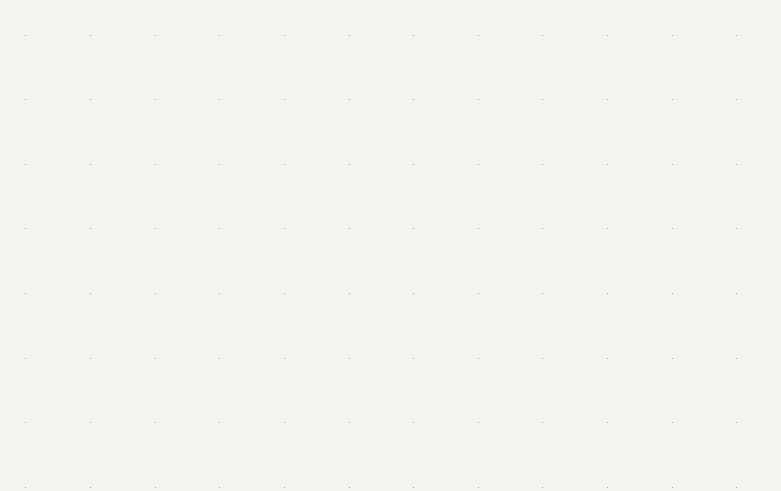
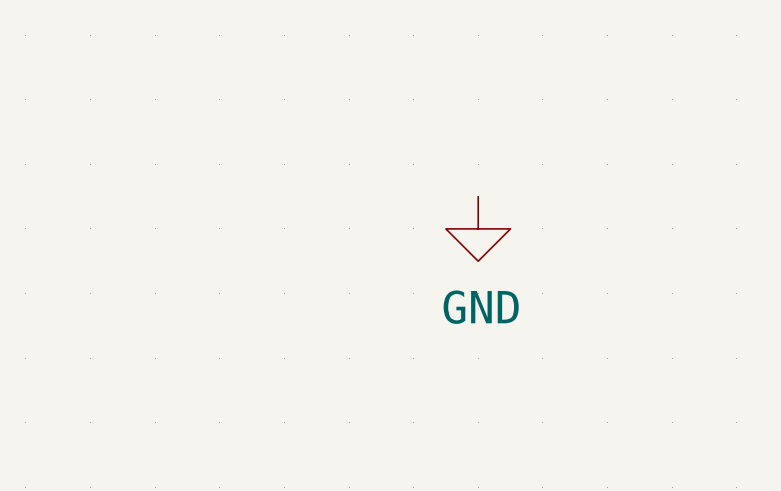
power symbol: none -> GND (478, 228)

